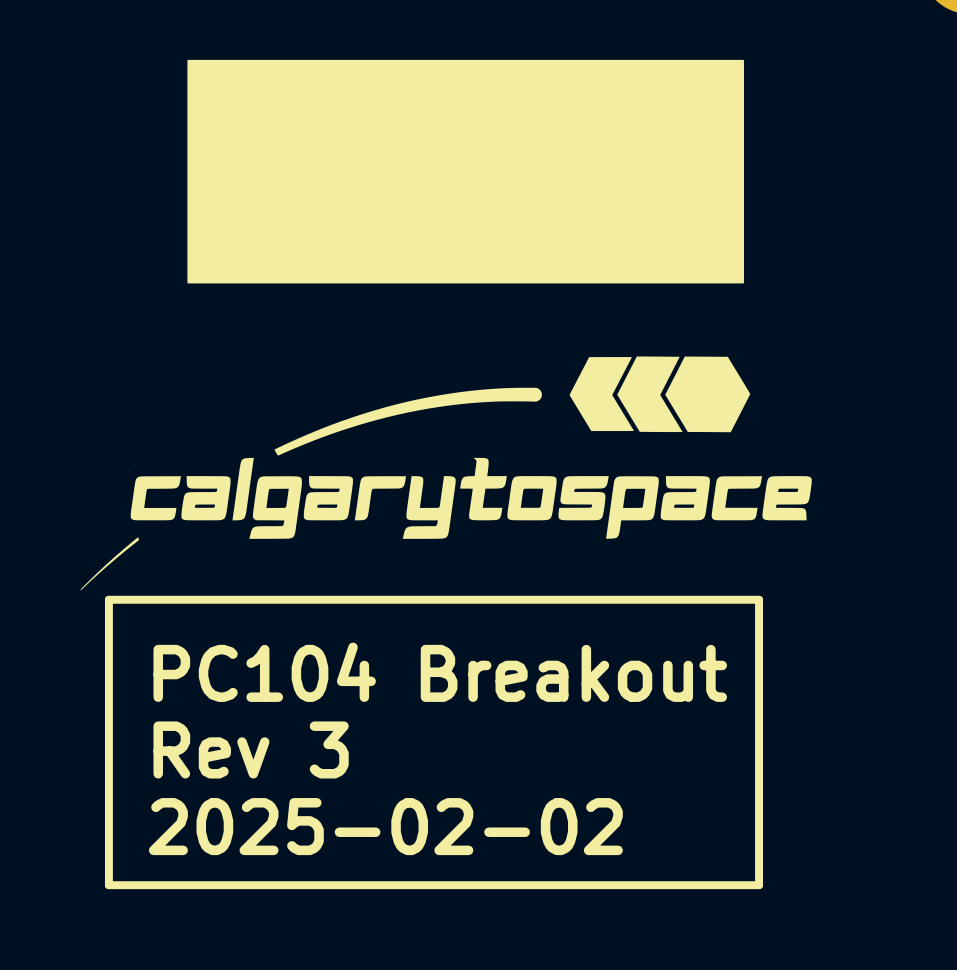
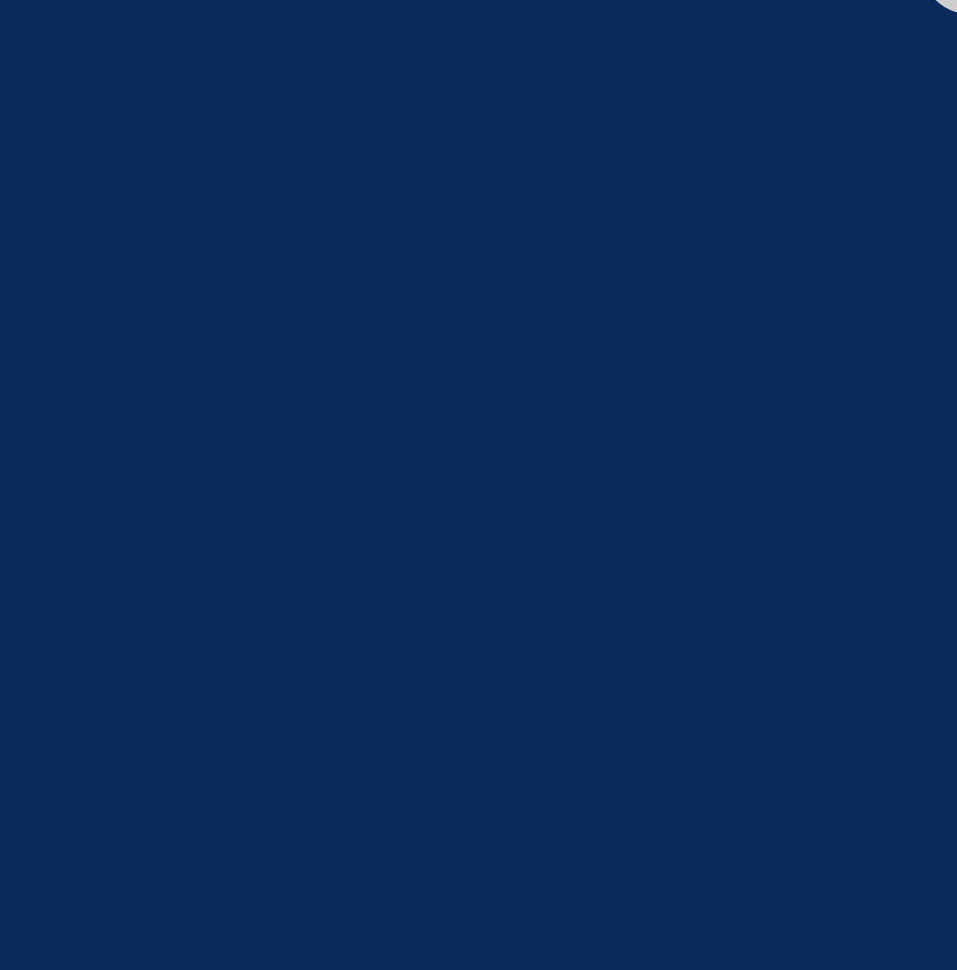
drawing: [187, 59, 744, 284] -> none
drawing: [80, 356, 812, 591] -> none
line: (108, 599) (759, 599) (759, 885) (108, 885) (108, 599) -> none
text: PC104 Breakout (440, 672) -> none
text: Rev 3 (251, 749) -> none
text: 2025-02-02 (385, 826) -> none

